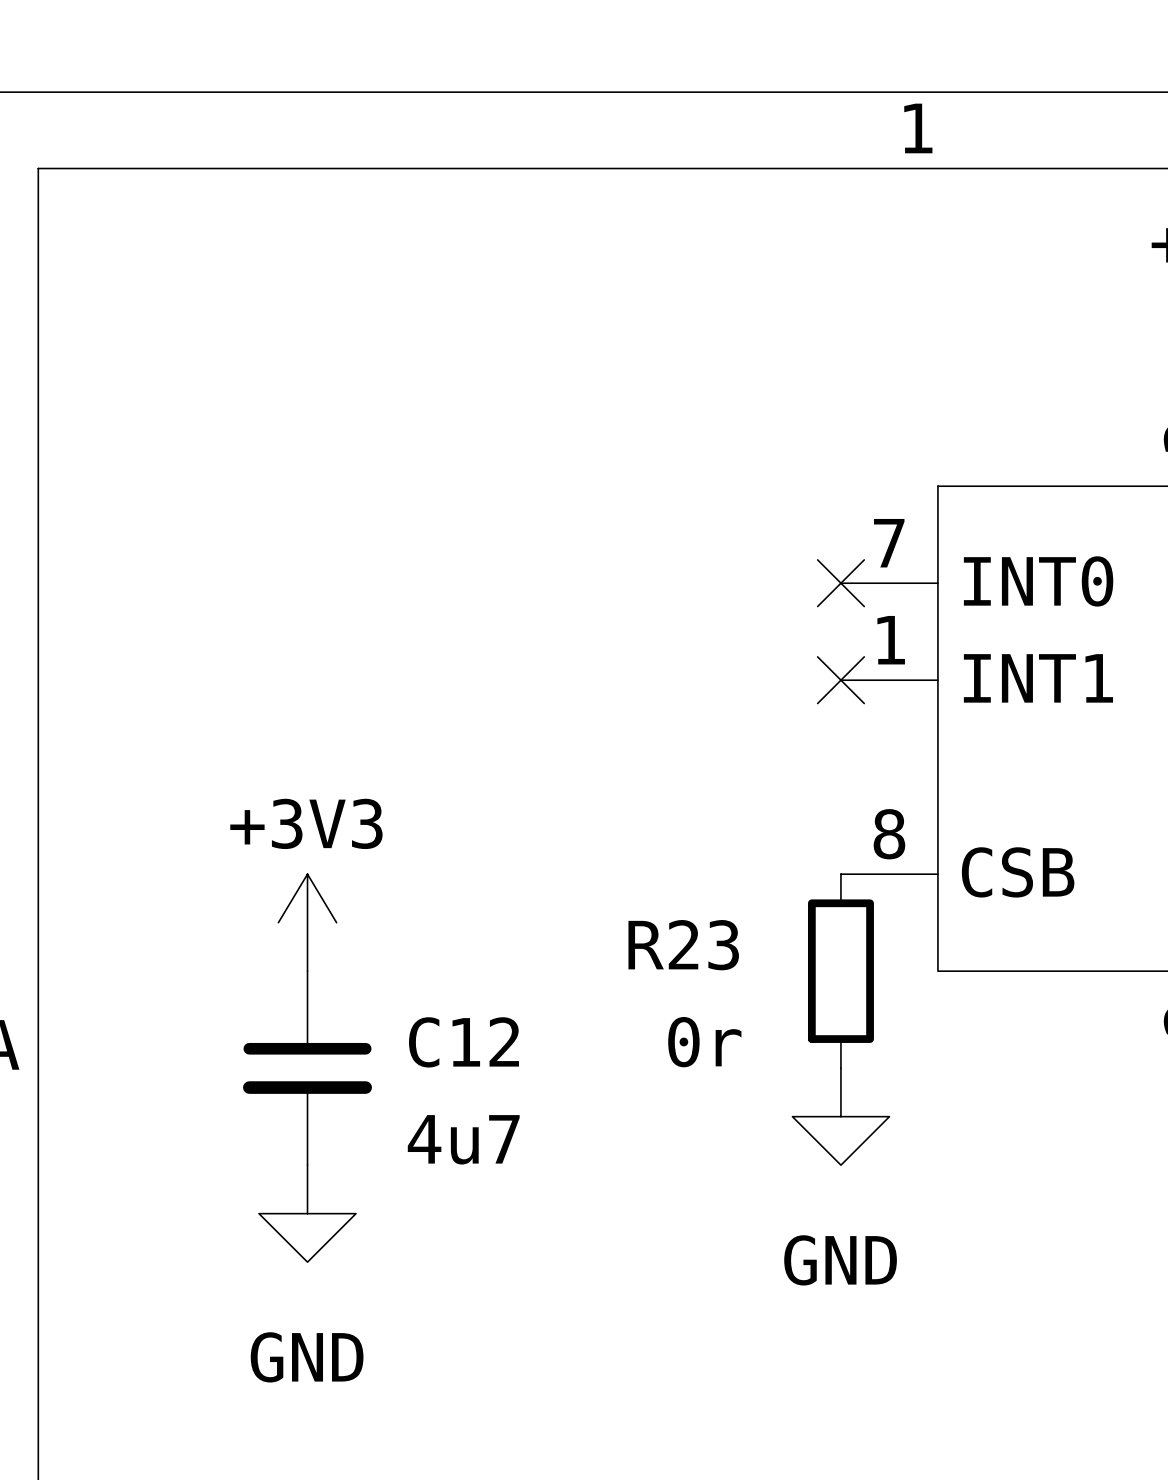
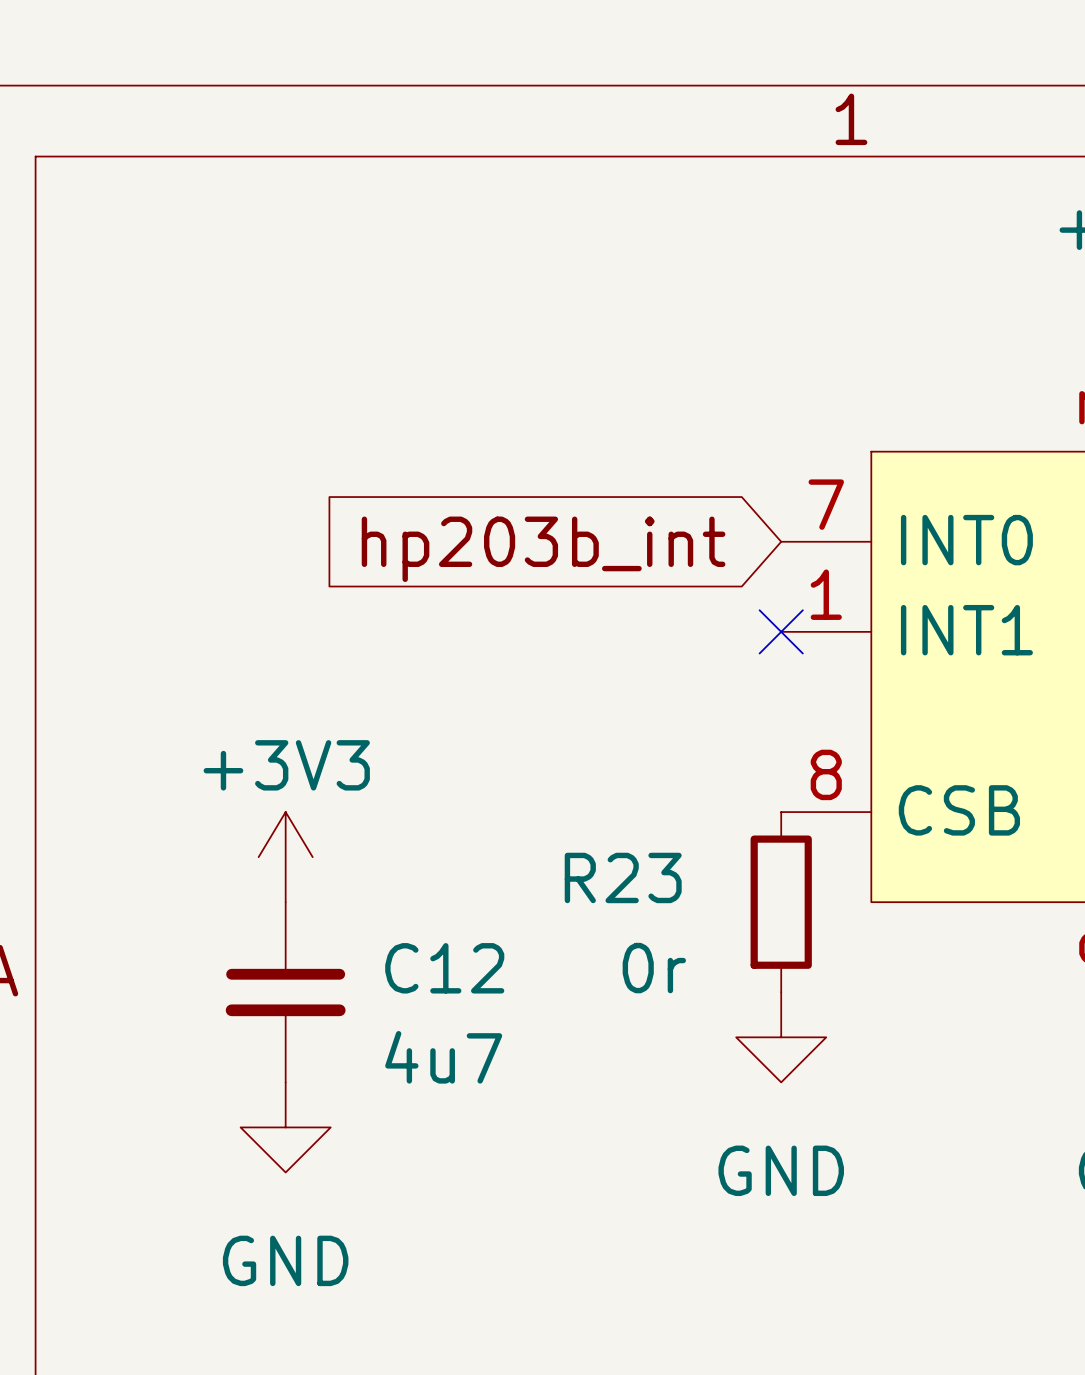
no-connect mark: (840, 583) -> none
global label: none -> hp203b_int (543, 549)

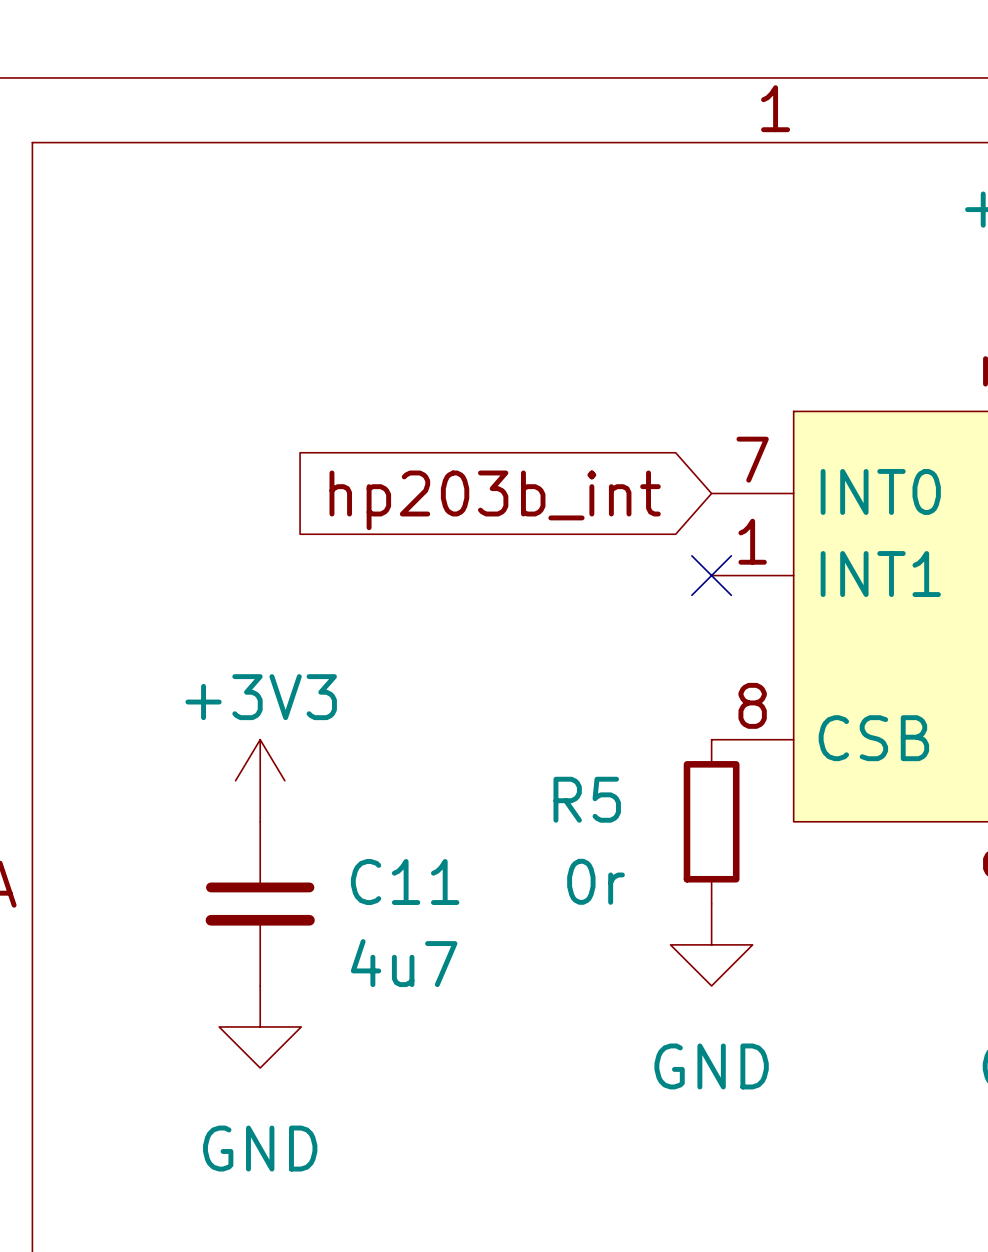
R23 name: R23 (623, 877) -> R5 (587, 799)
C12 name: C12 (444, 968) -> C11 (405, 882)

